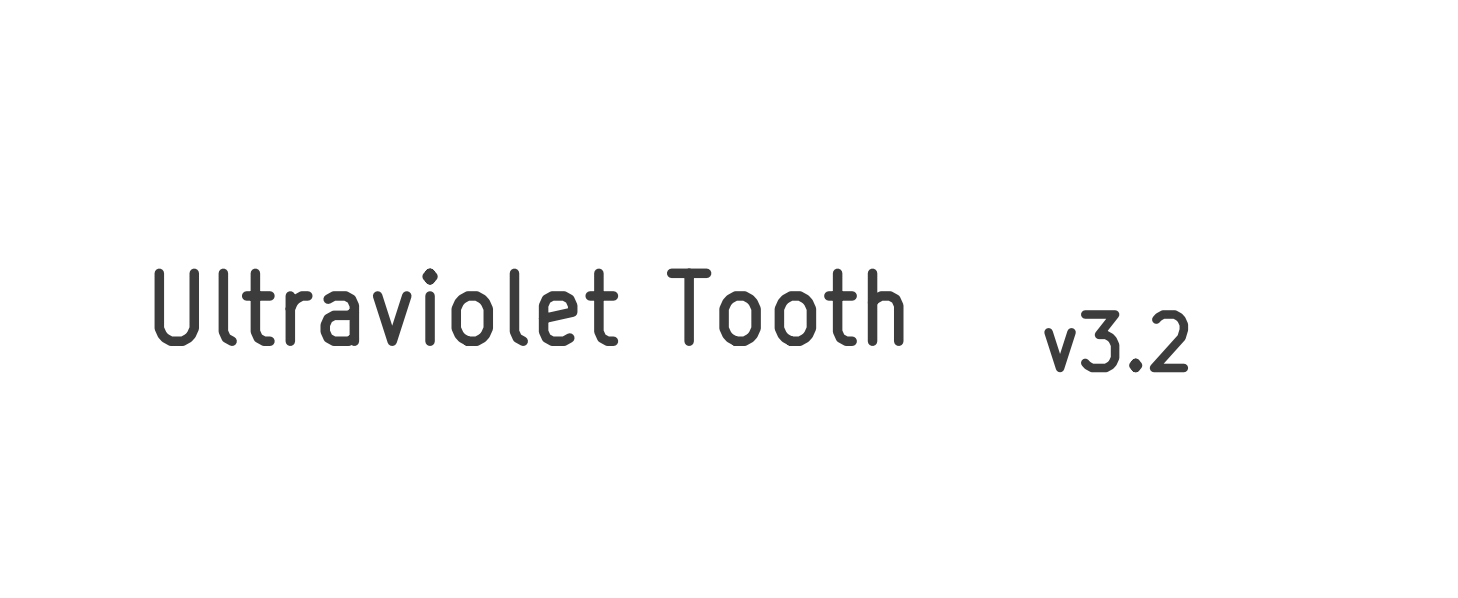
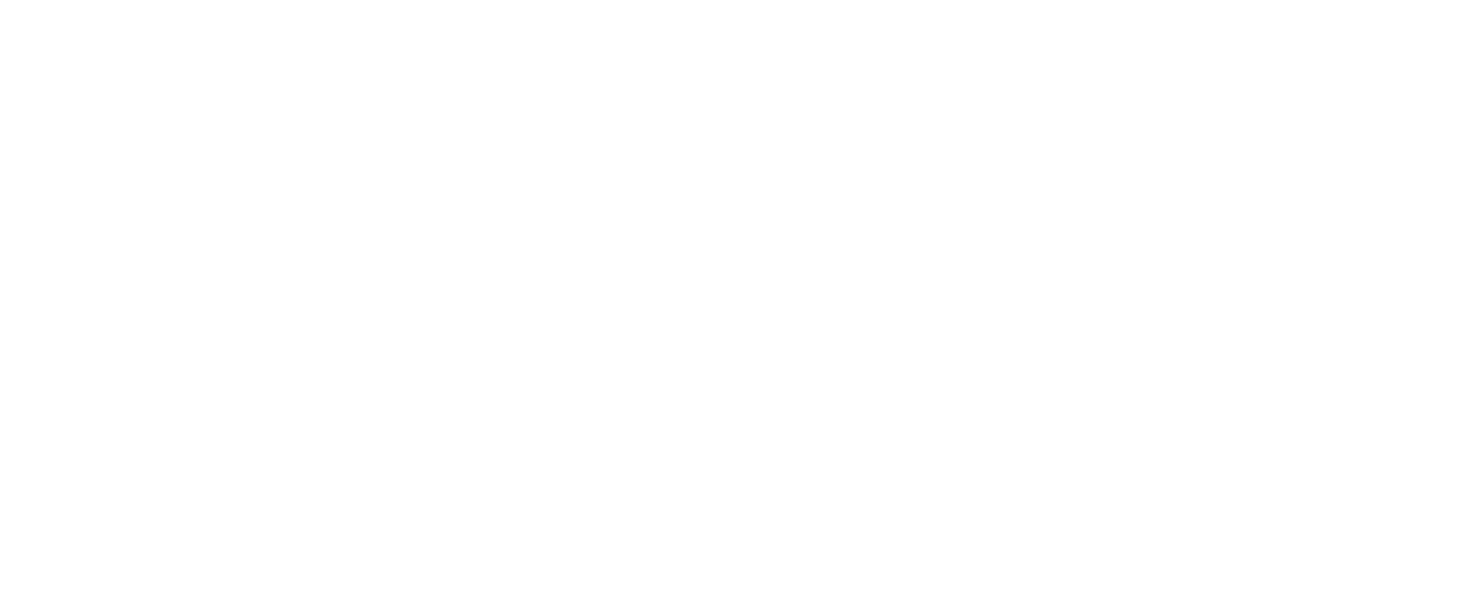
text: Ultraviolet Tooth (529, 307) -> none
text: v3.2 (1116, 341) -> none

